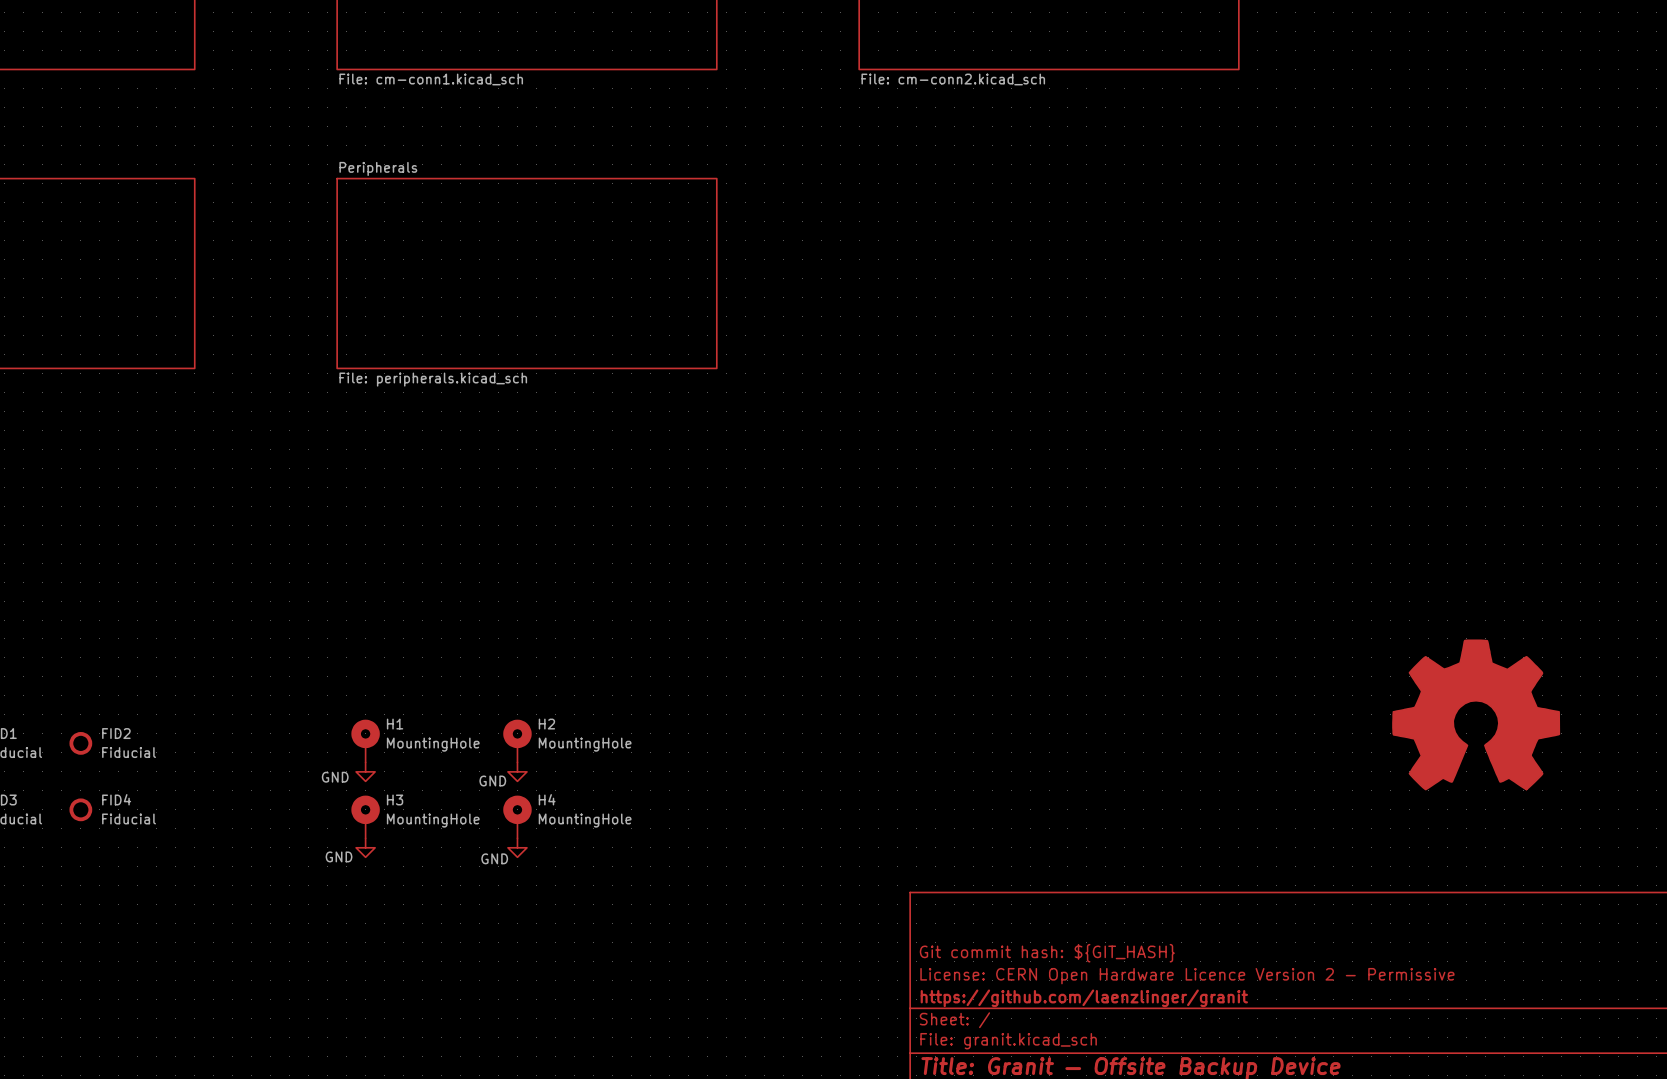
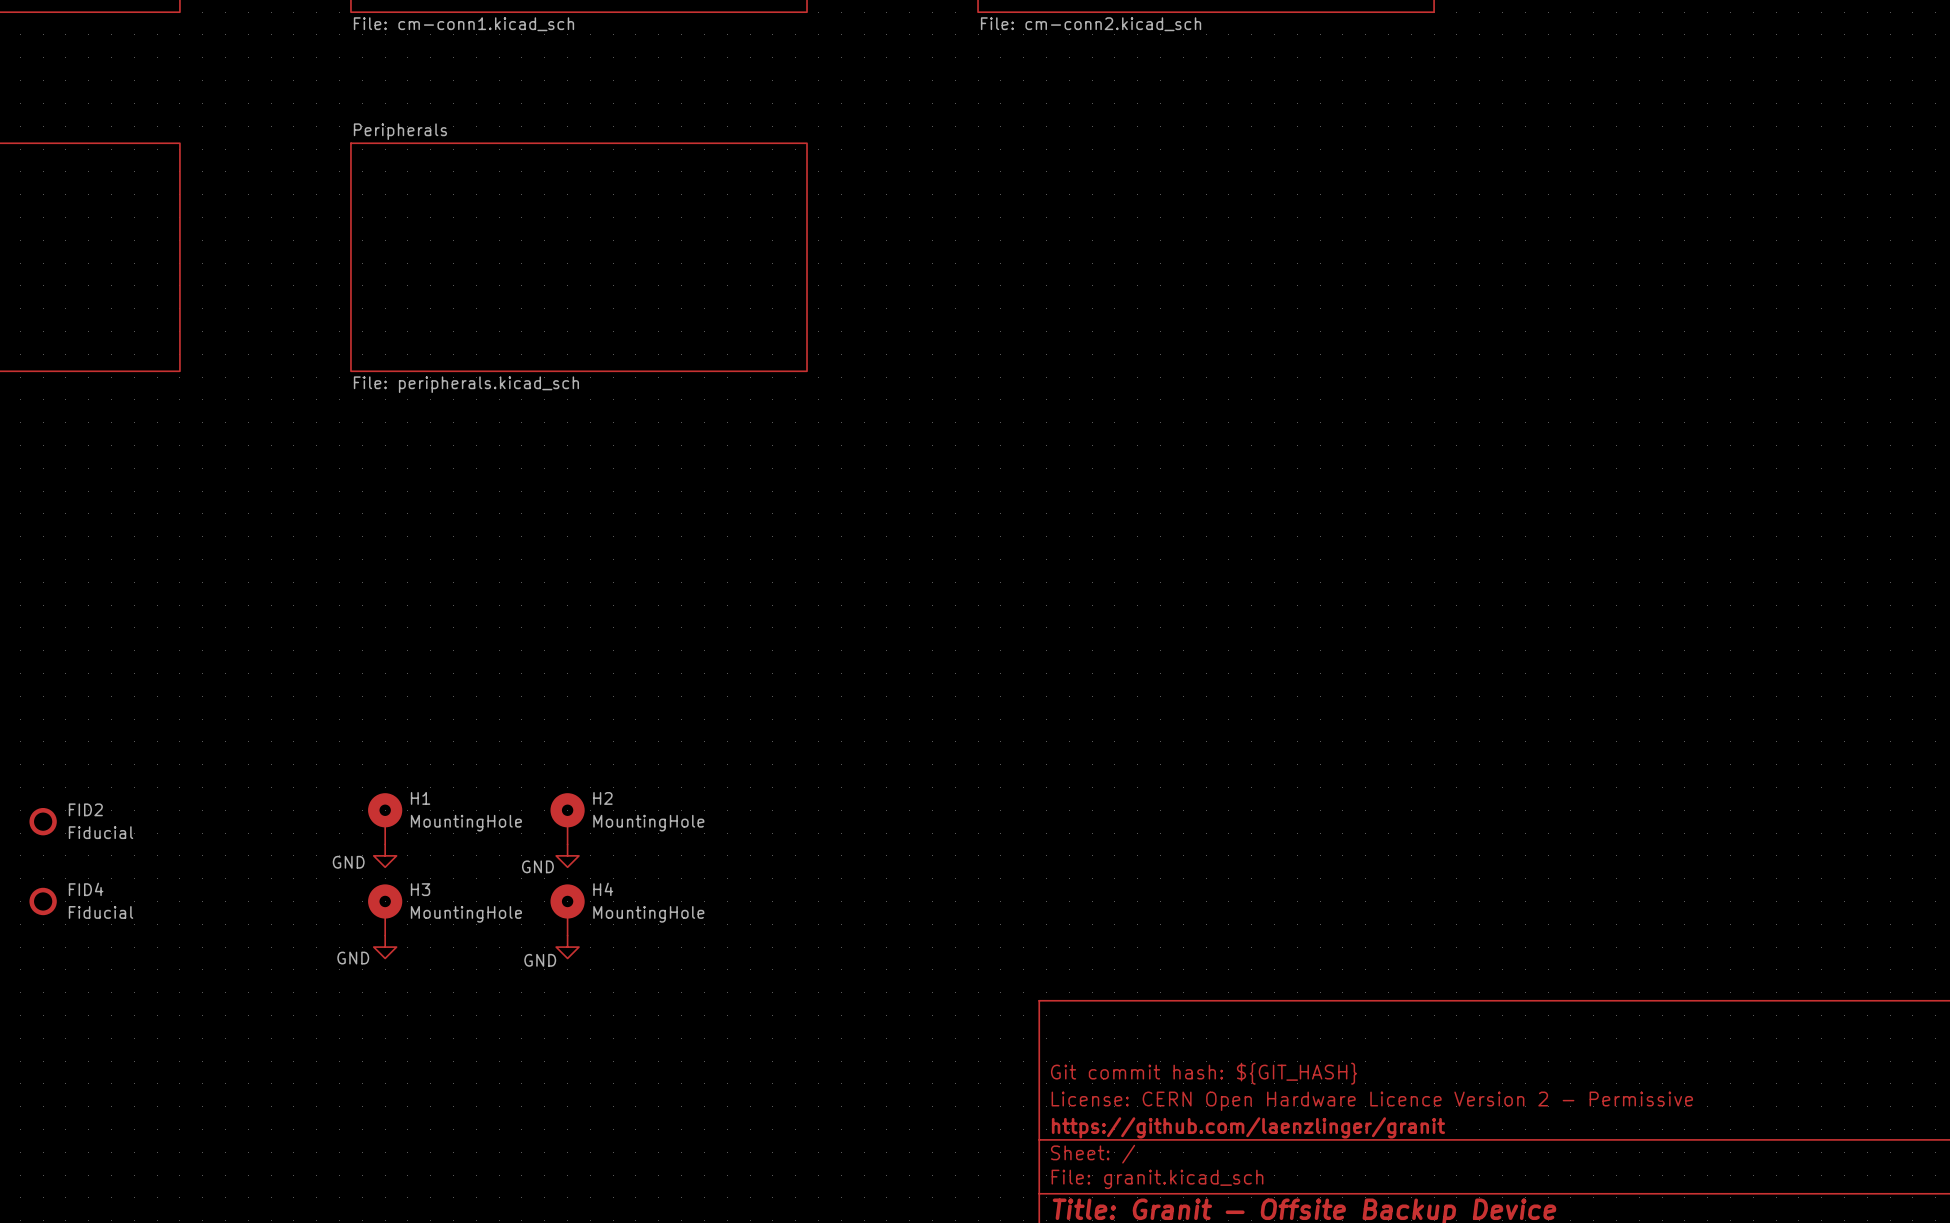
part: (1476, 714) -> none

